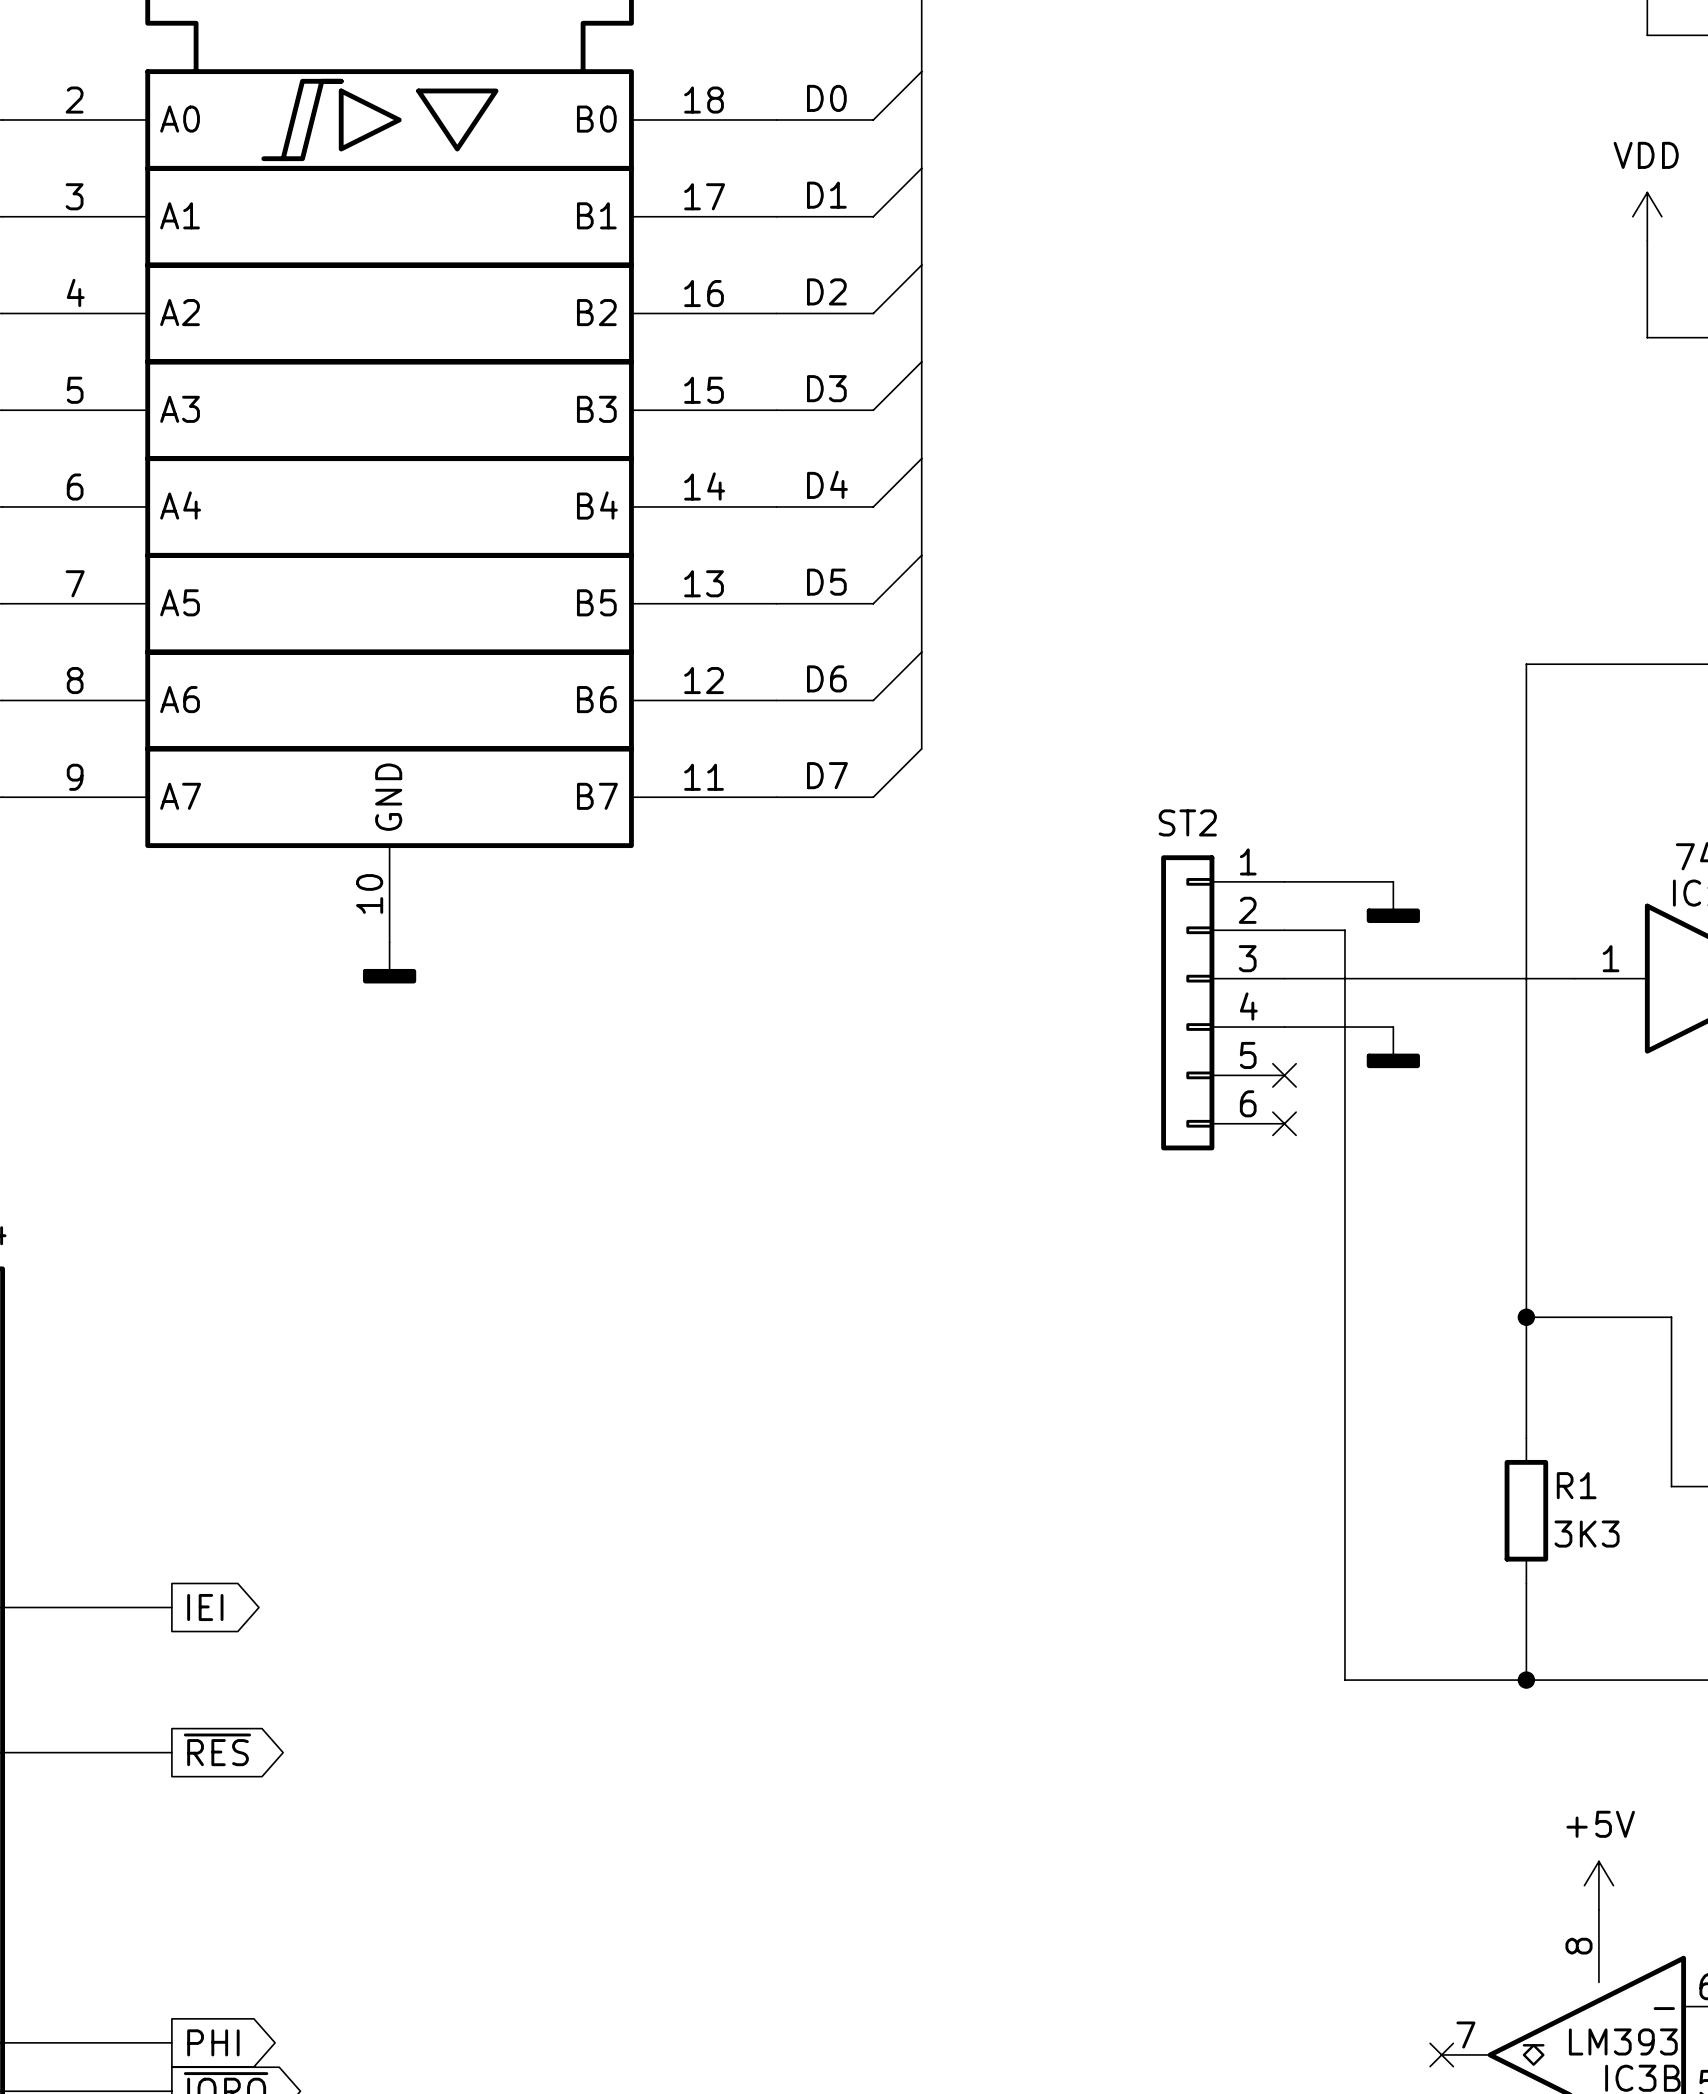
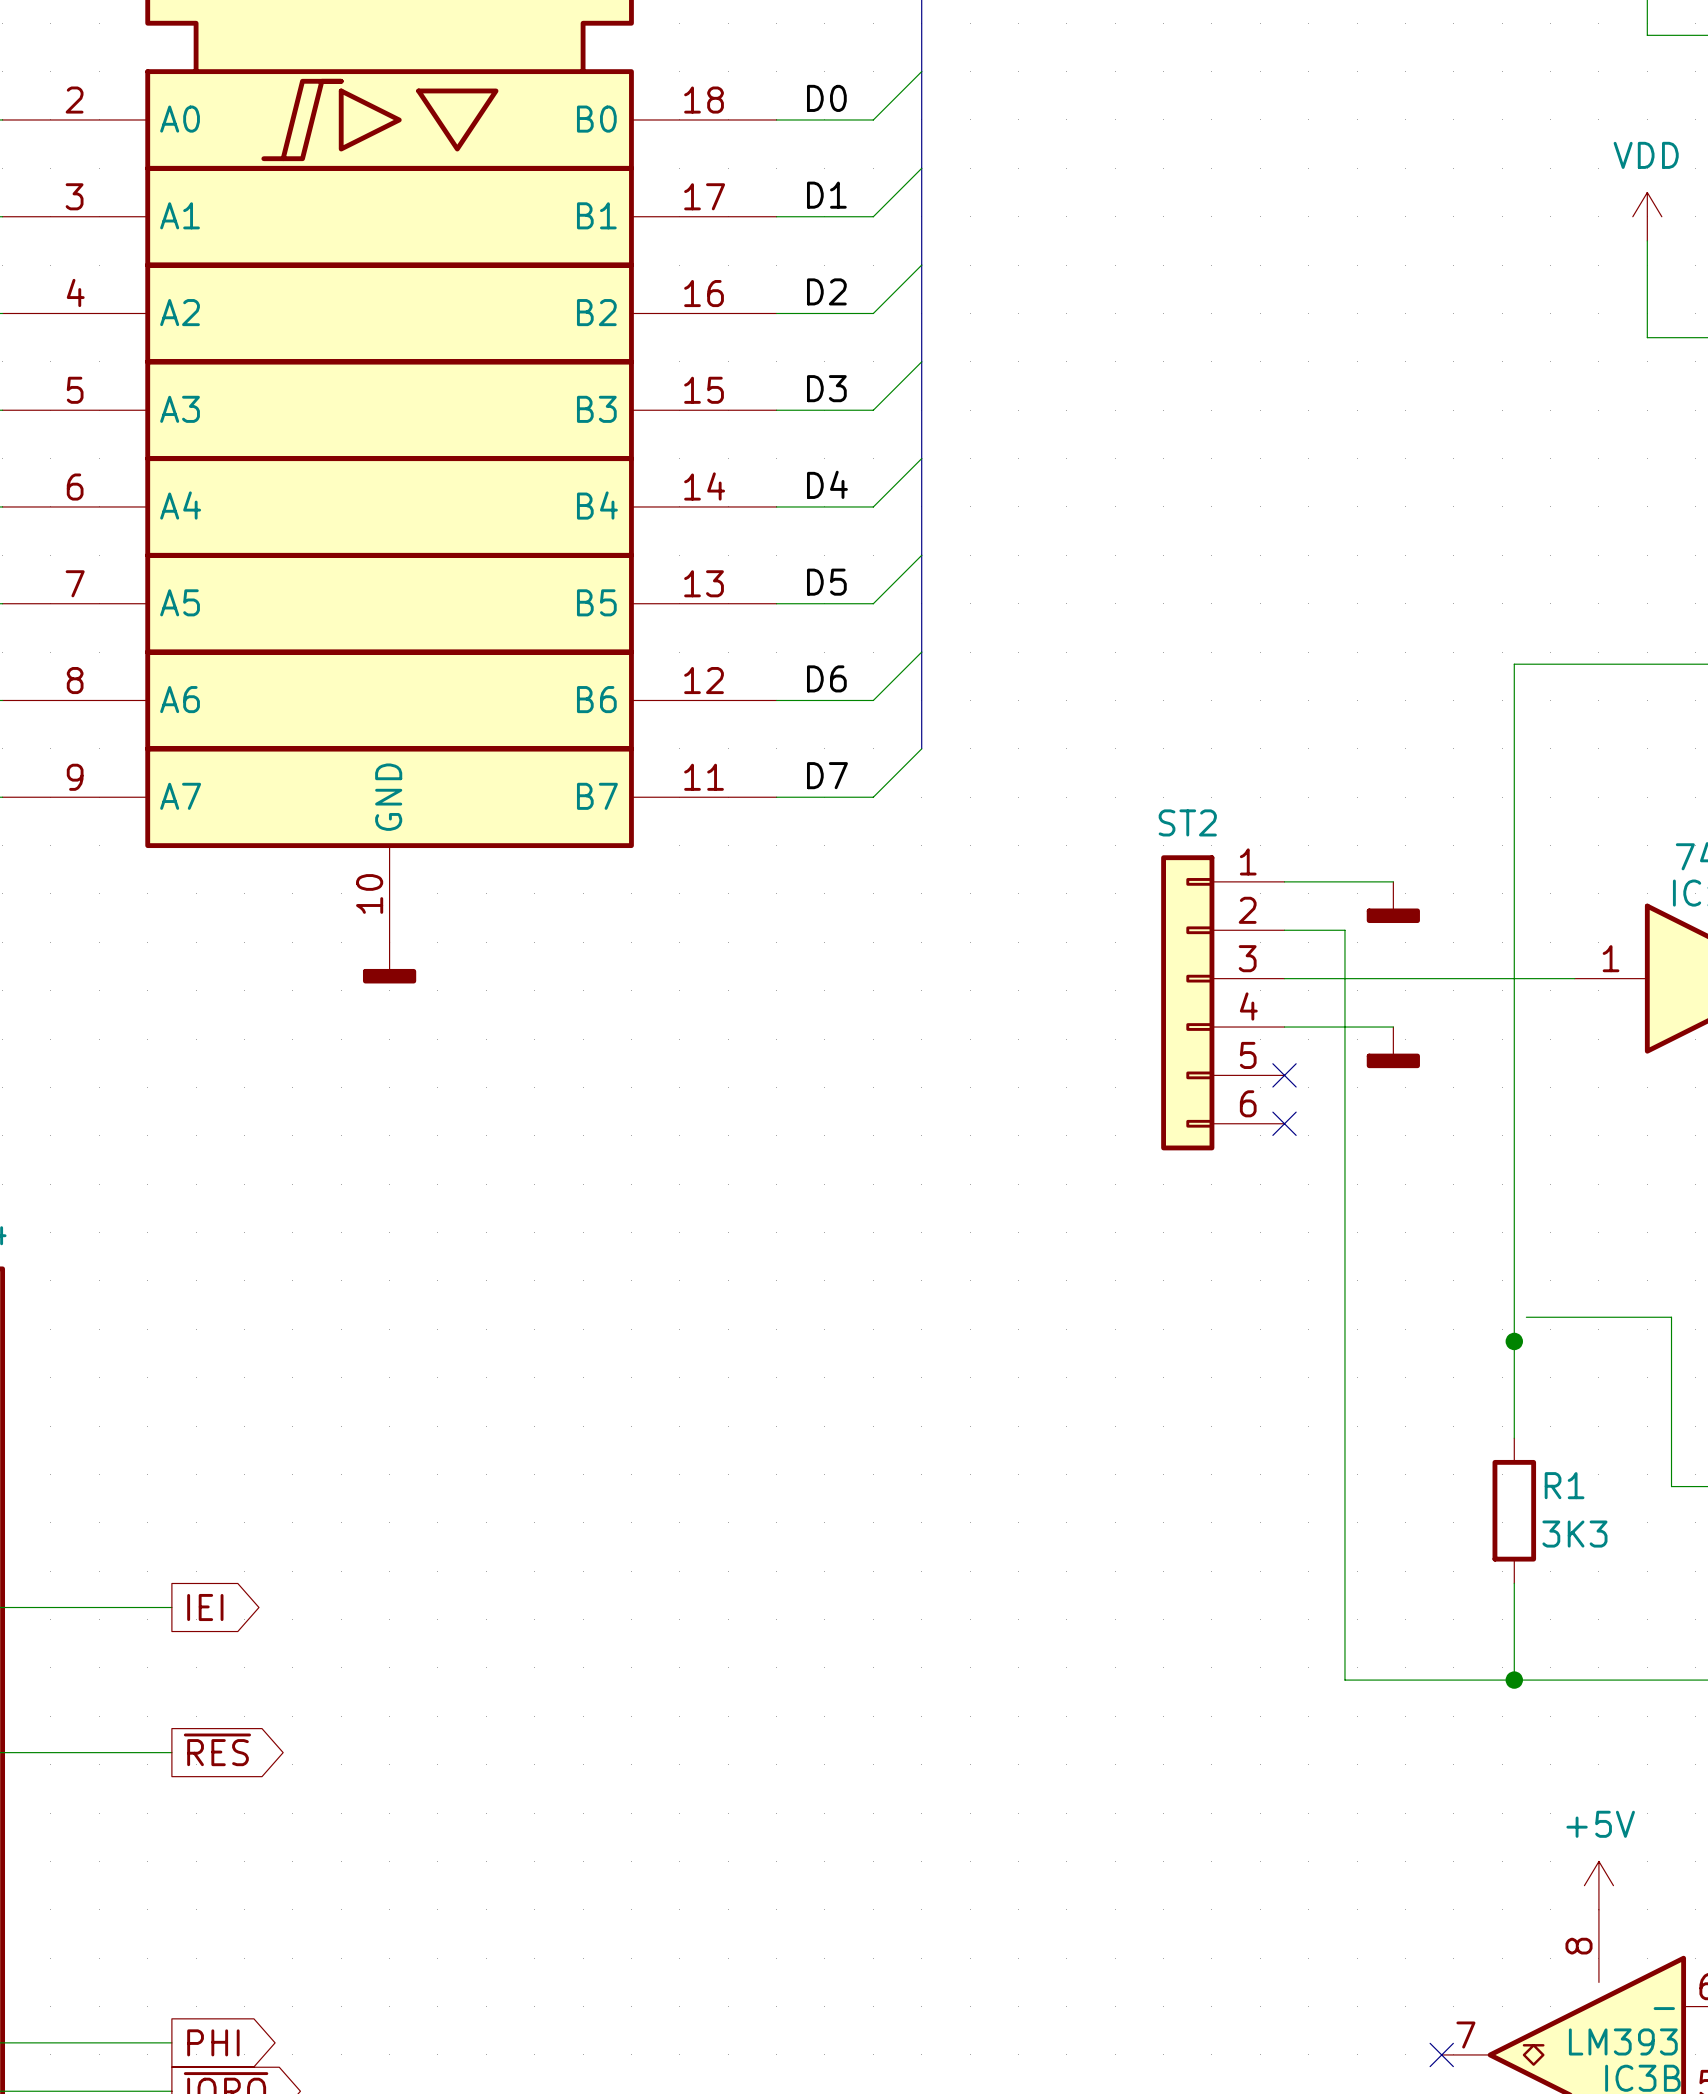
wire: (1526, 664) (1526, 1438) -> (1526, 664) (1514, 664) (1514, 1438)
junction position: (1526, 1317) -> (1514, 1341)
R1 position: (1526, 1510) -> (1514, 1510)
wire: (1526, 1583) (1526, 1680) -> (1514, 1583) (1514, 1680)
junction position: (1526, 1680) -> (1514, 1680)

